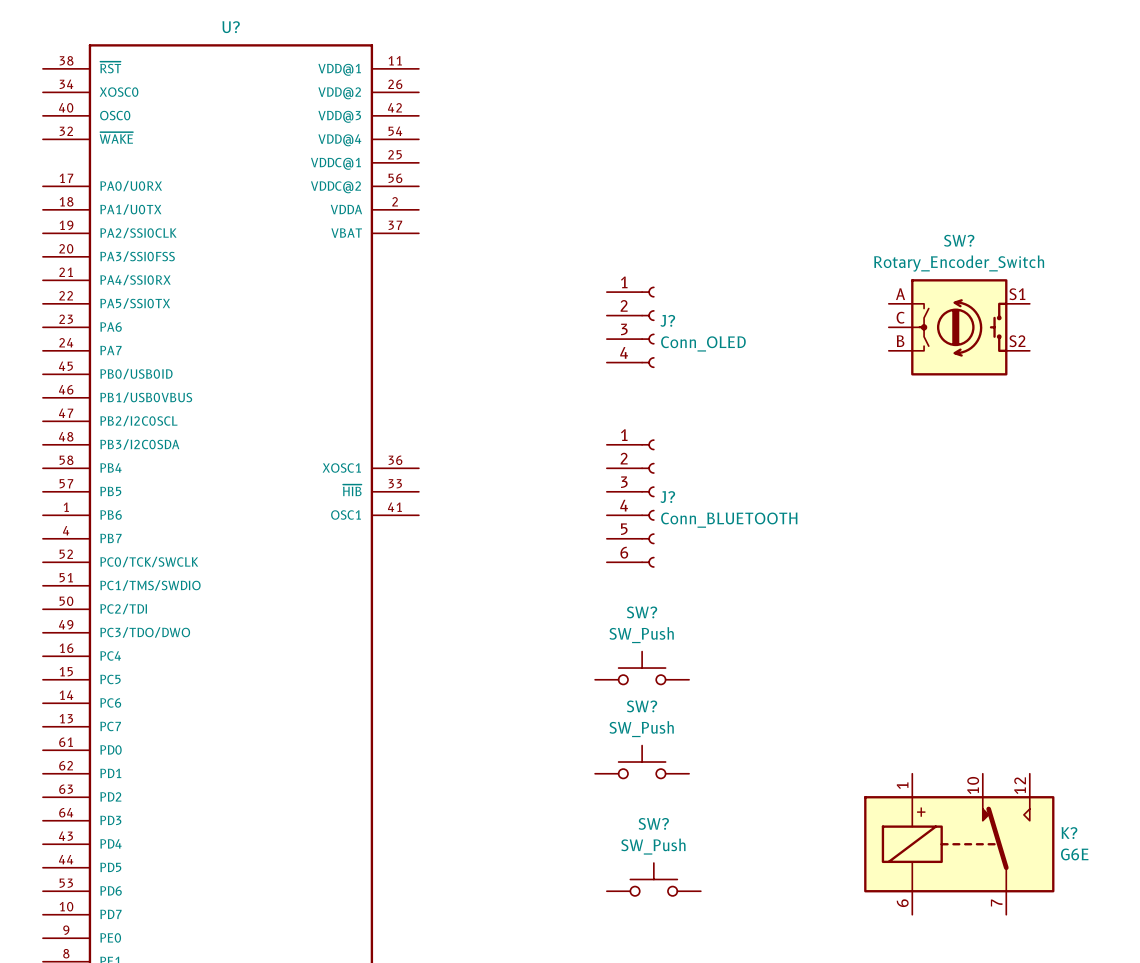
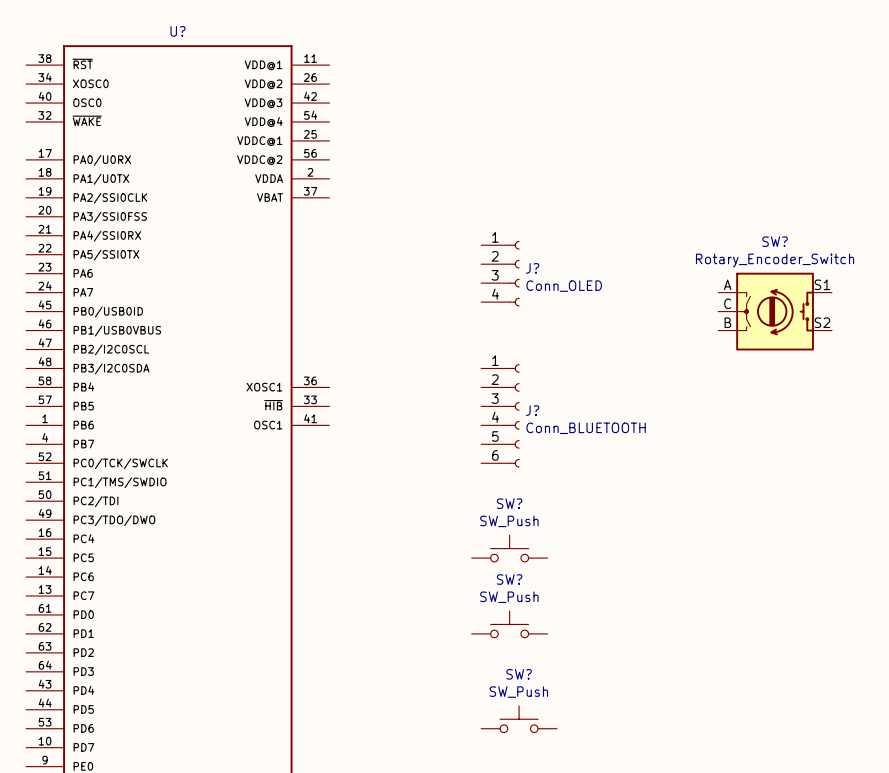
SW? position: (959, 327) -> (775, 311)
K?: G6E (959, 844) -> none

